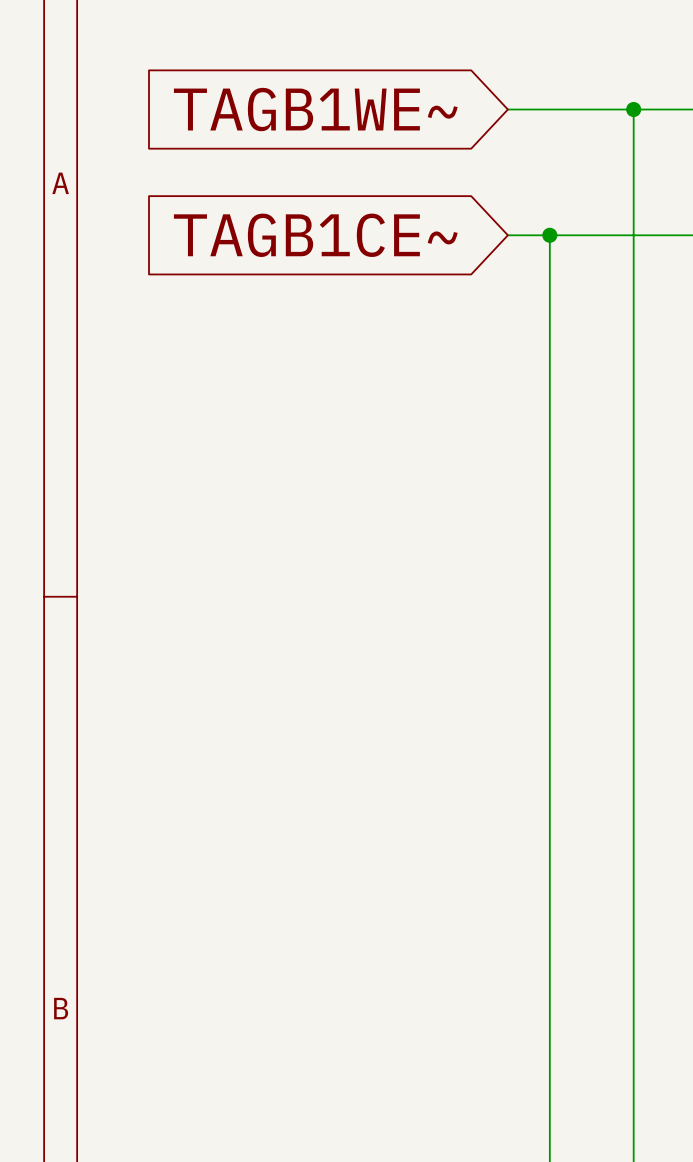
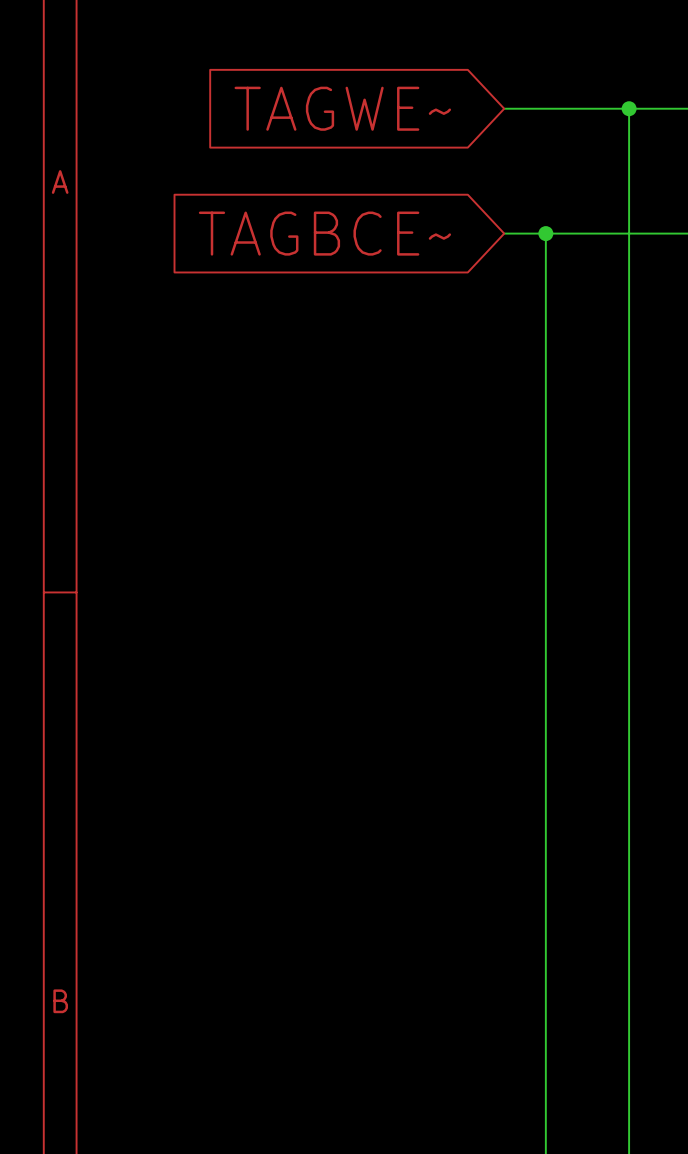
global label: TAGB1WE~ (315, 109) -> TAGWE~ (342, 108)
global label: TAGB1CE~ (315, 235) -> TAGBCE~ (324, 233)

